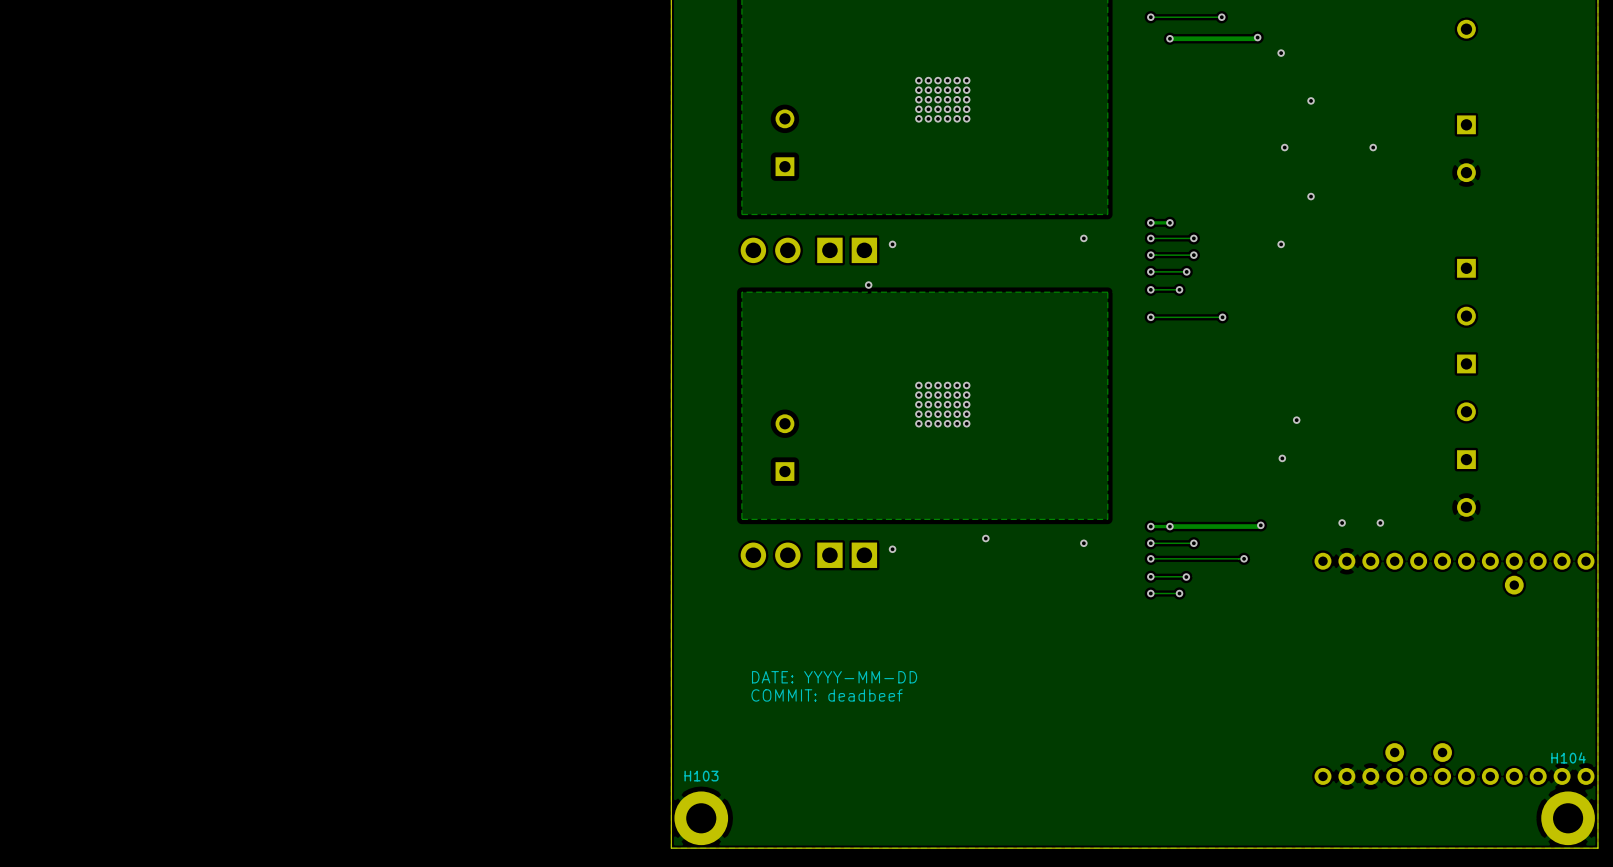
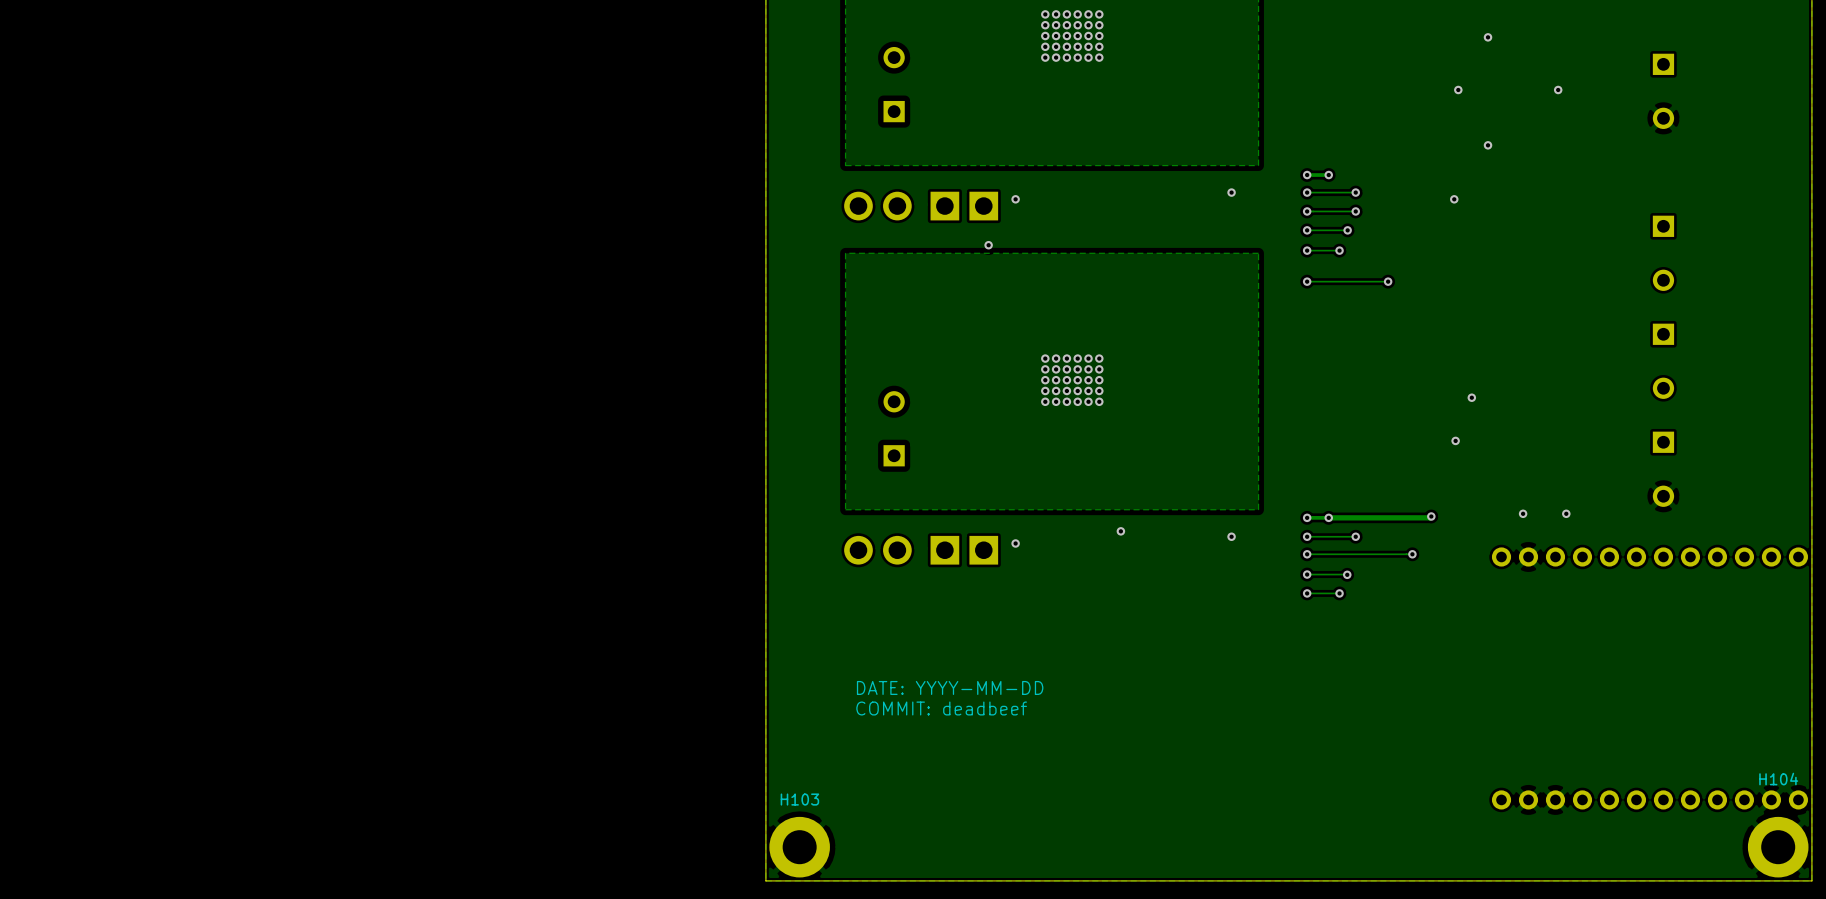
part: (1514, 585) -> none
part: (1394, 752) -> none
part: (1442, 752) -> none

